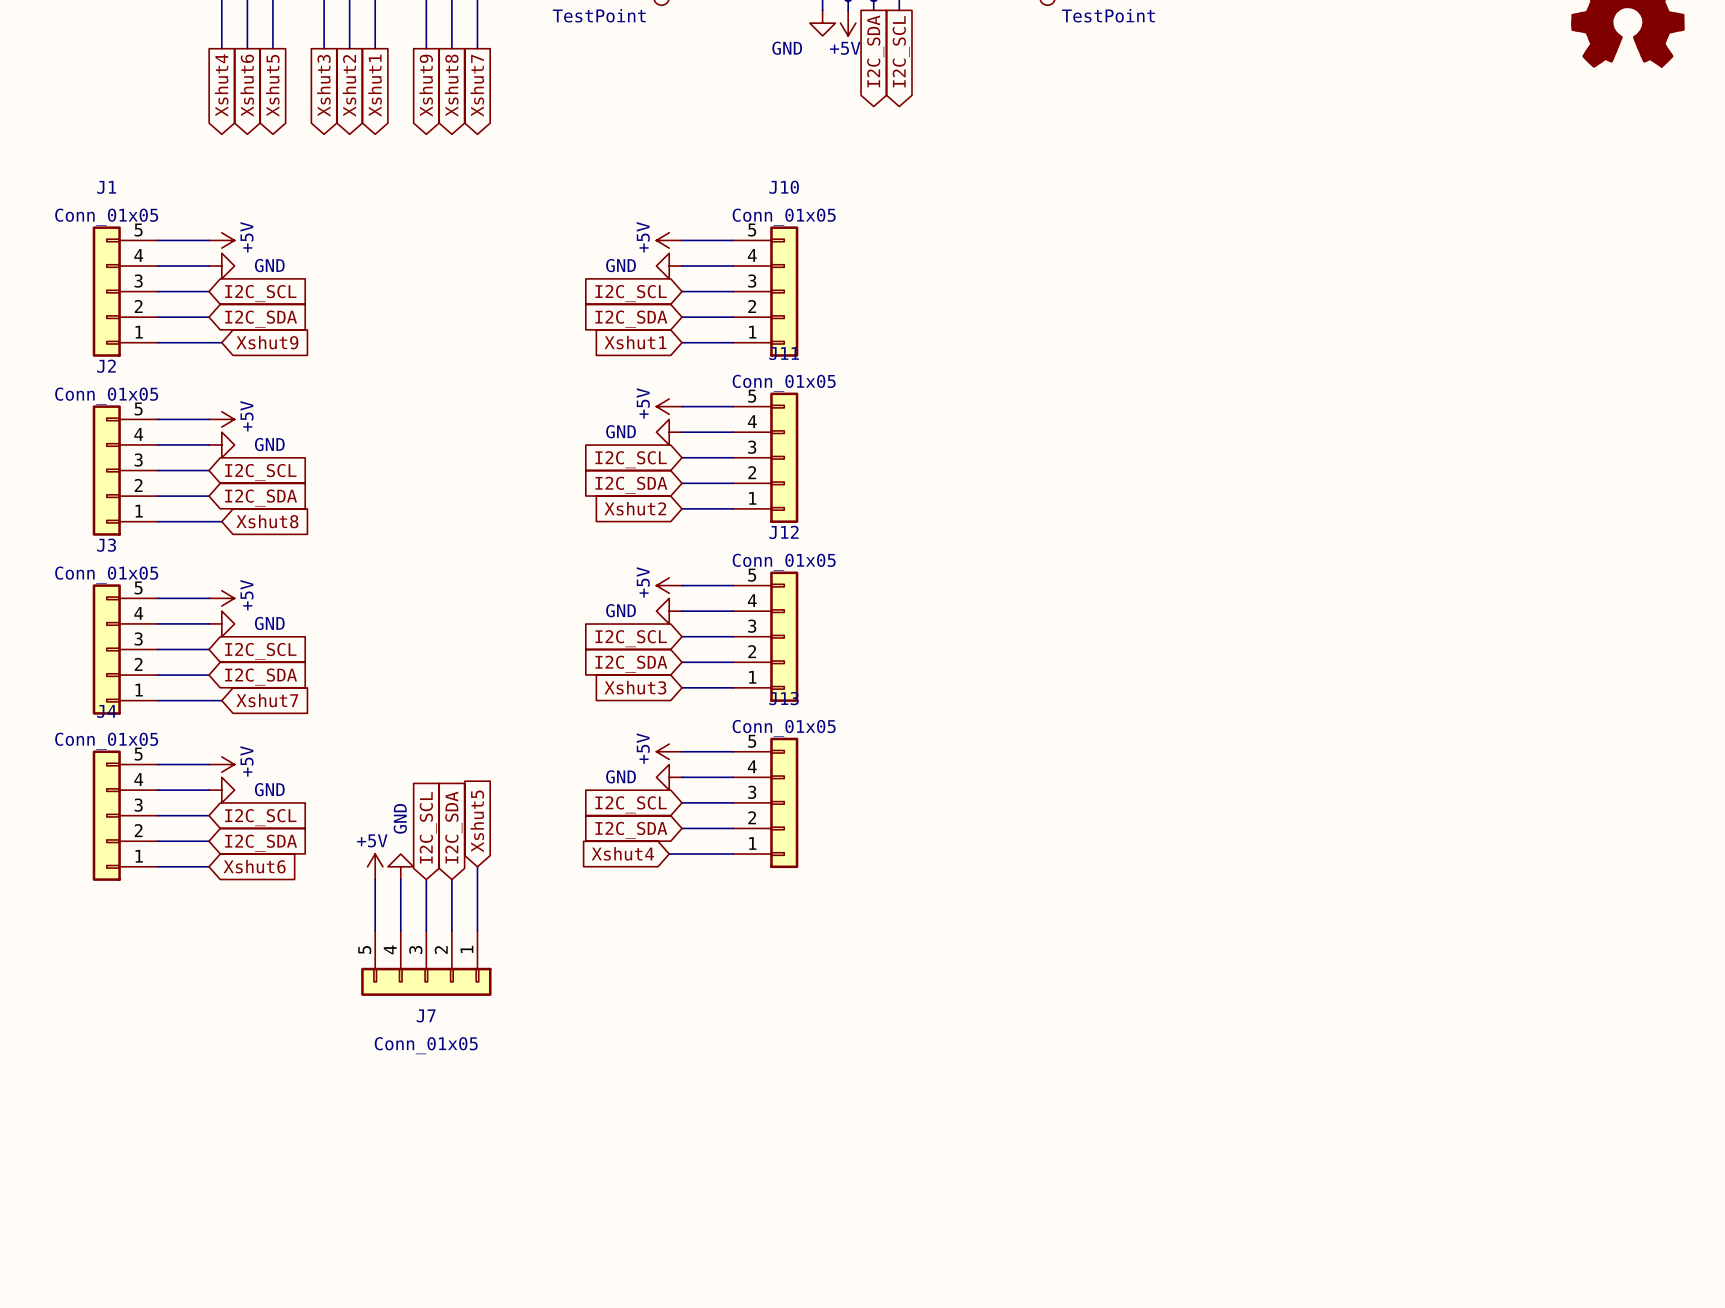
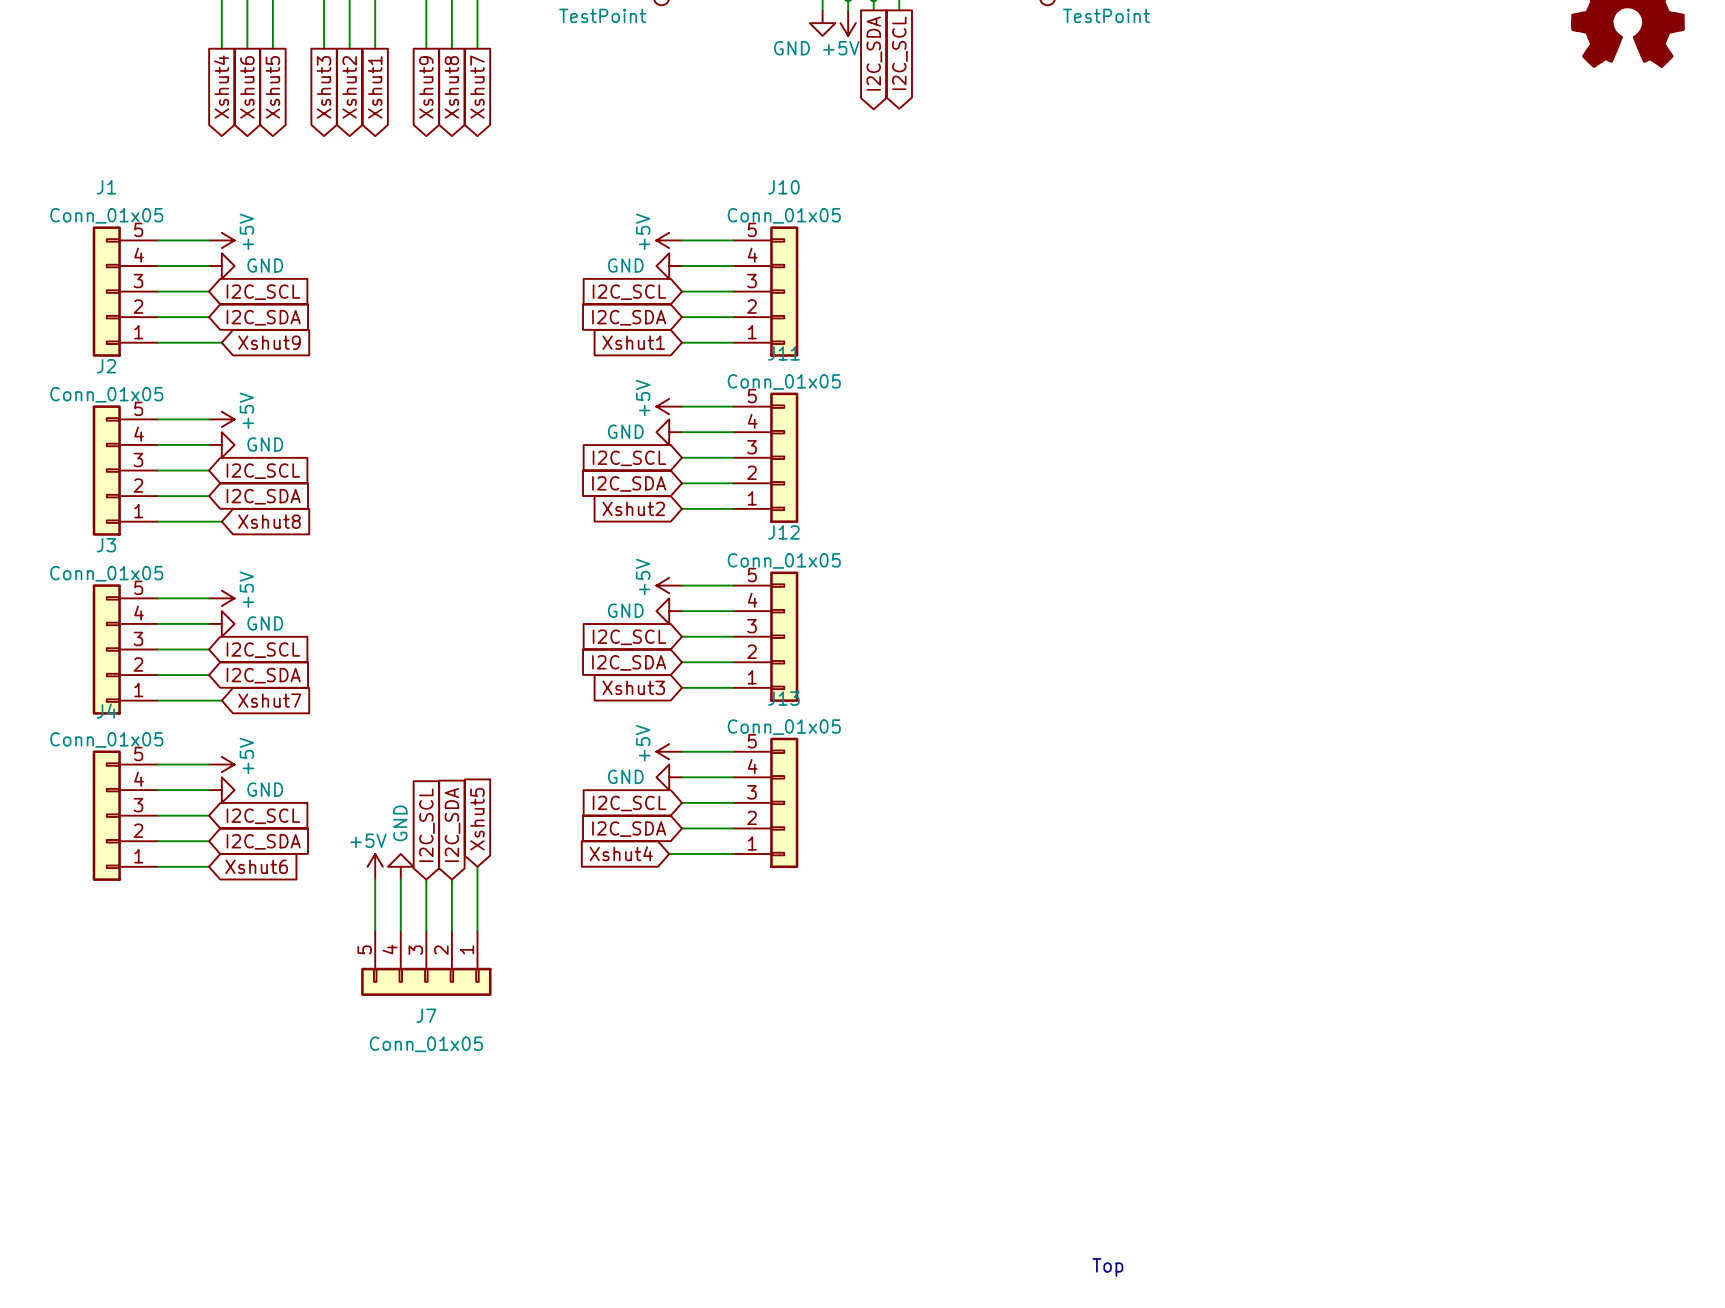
text: none -> Top (1107, 1267)

